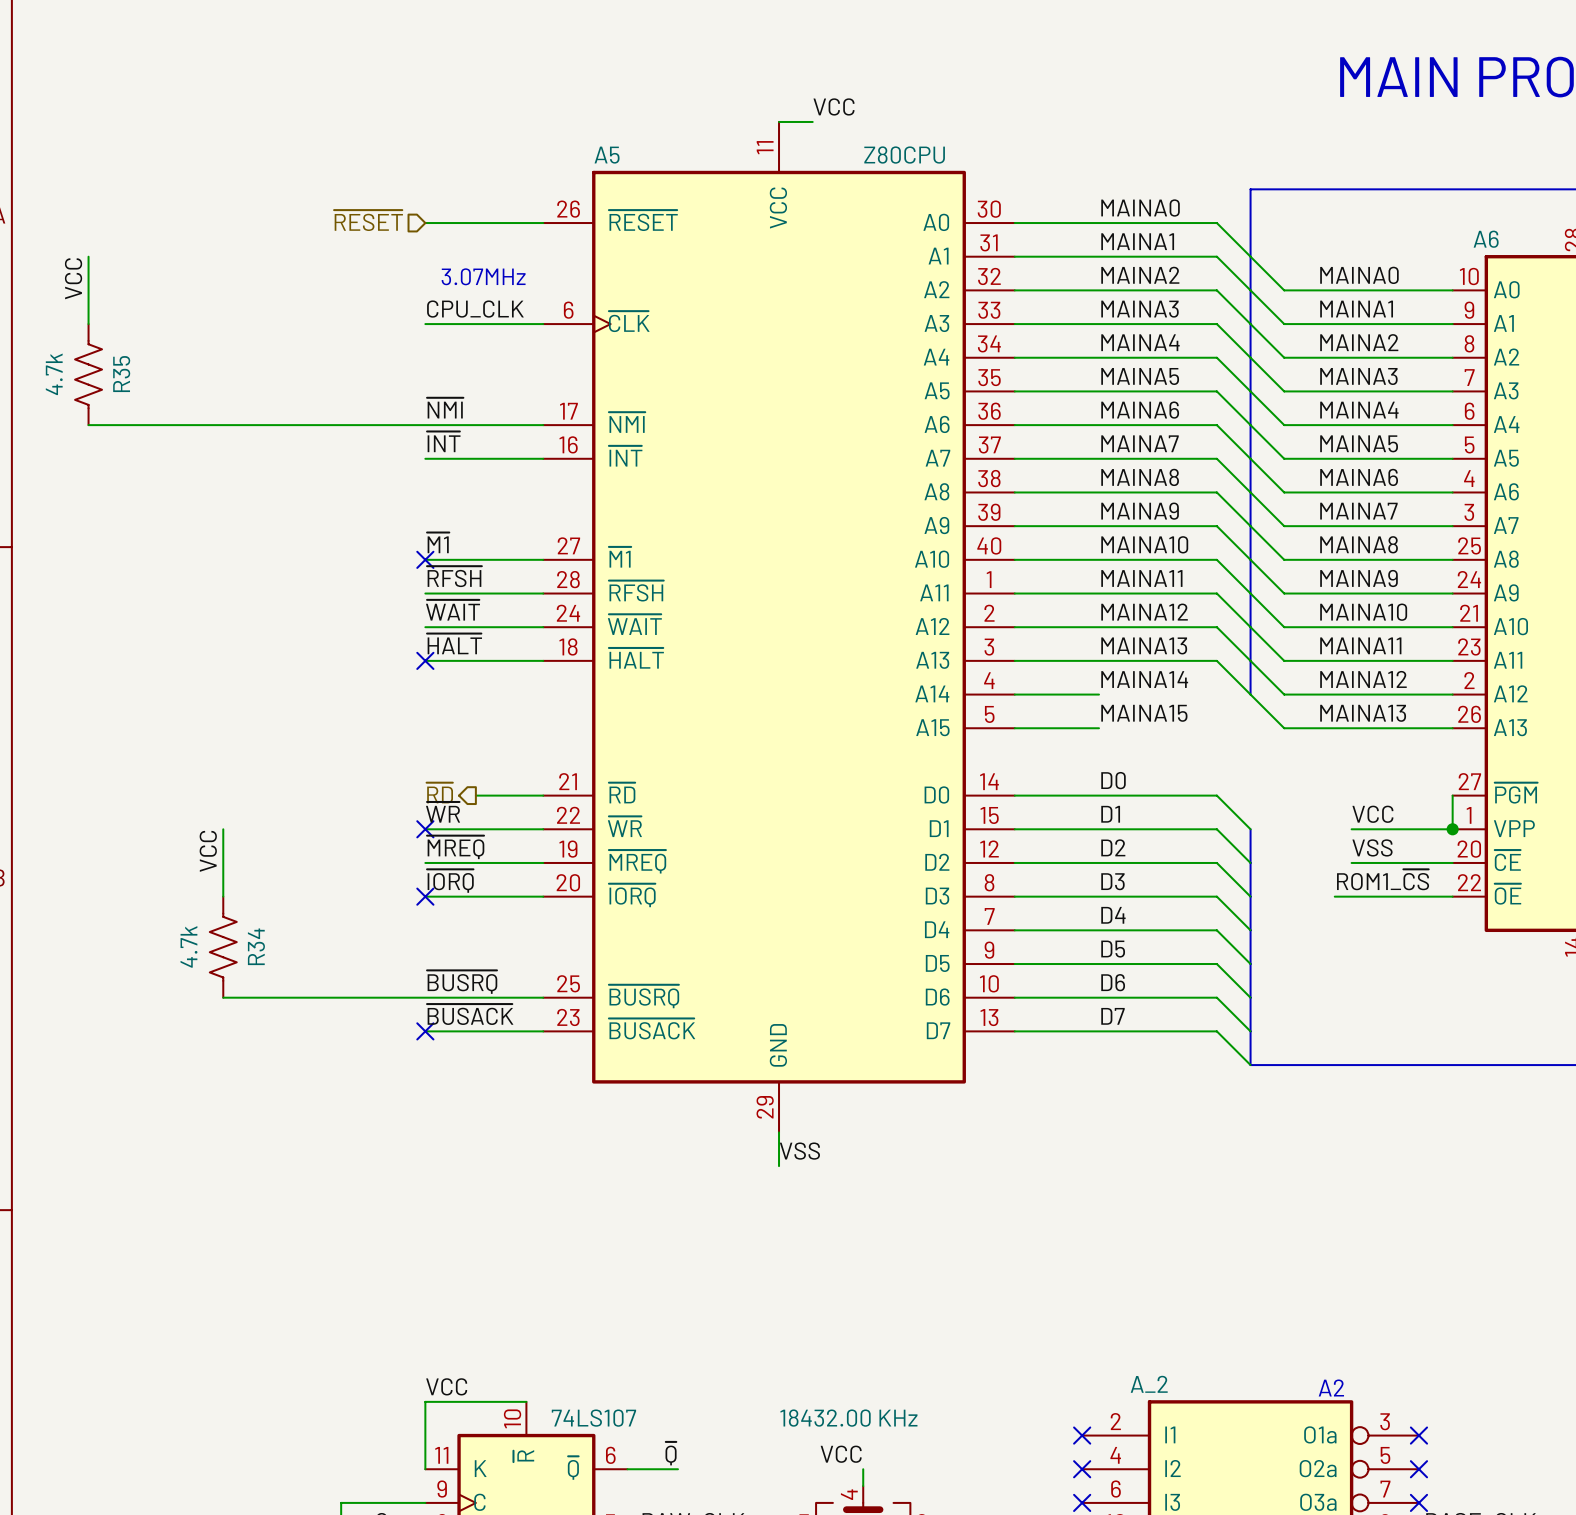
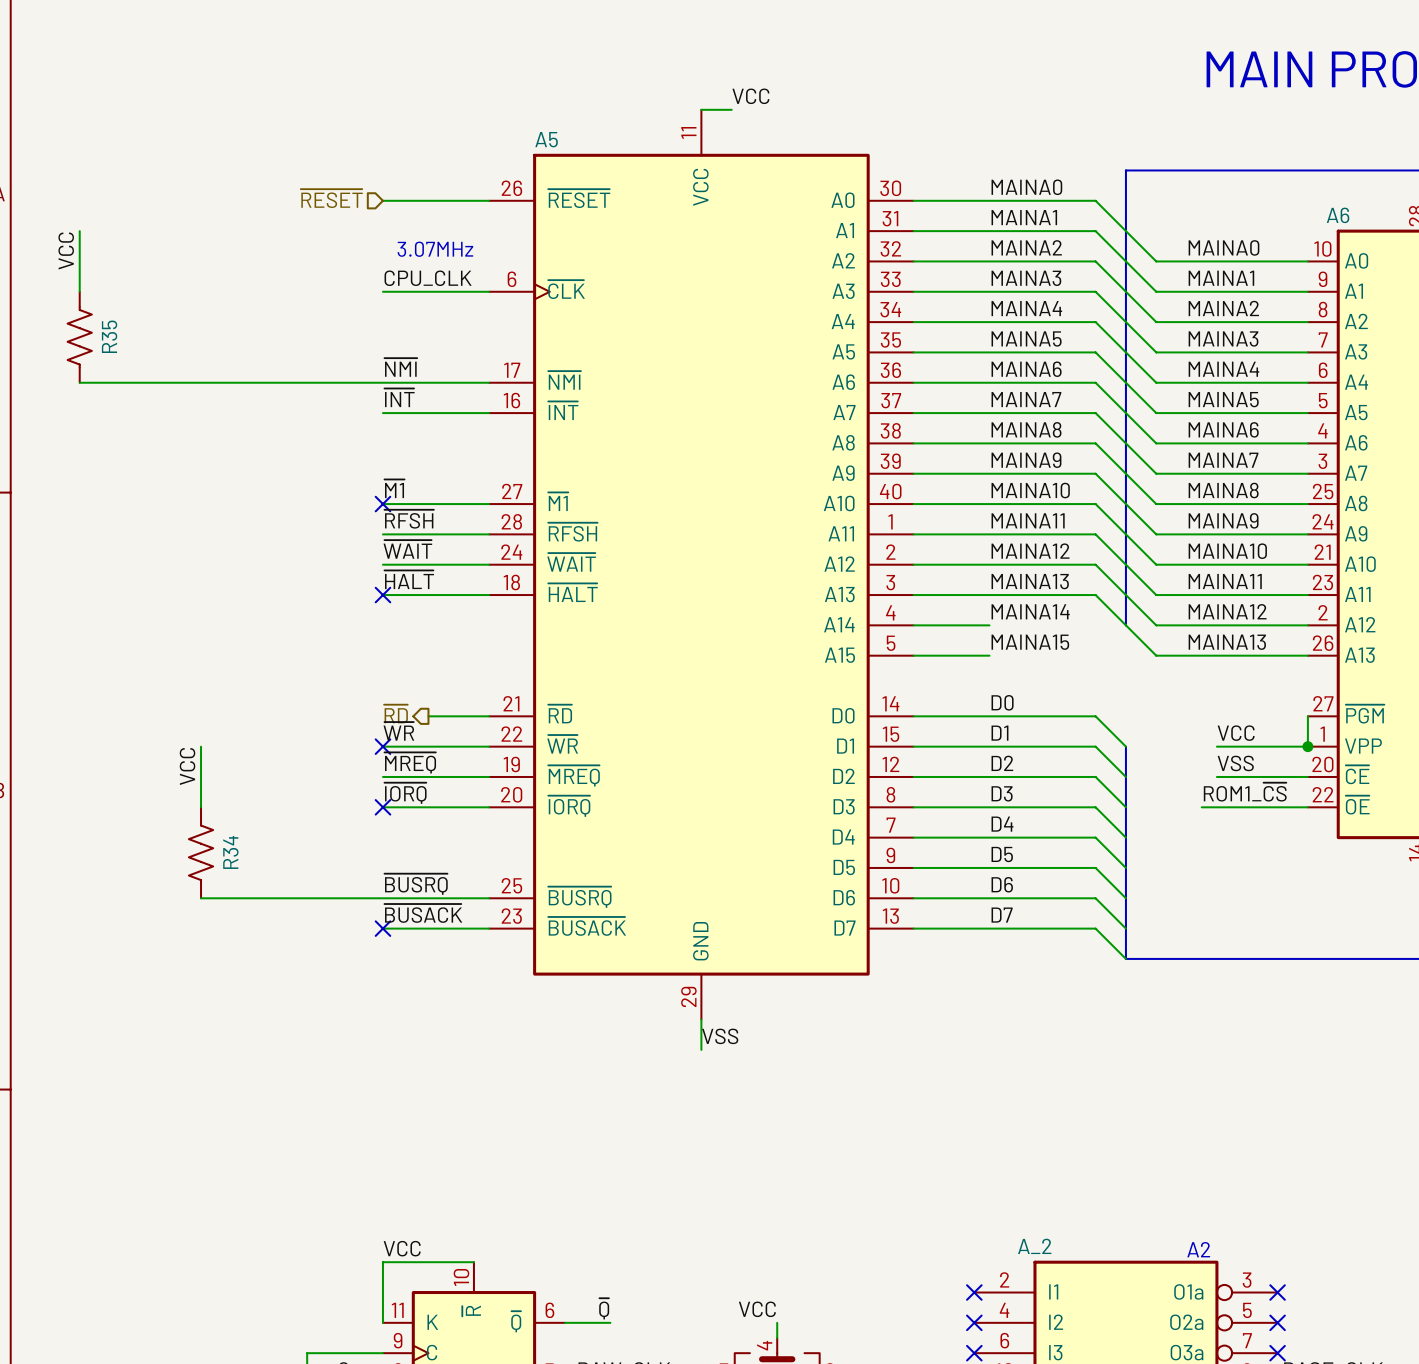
A5 value: Z80CPU (904, 155) -> none
R35 value: 4.7k (54, 374) -> none
R34 value: 4.7k (188, 946) -> none
part value: 74LS107 (593, 1418) -> none
part value: 18432.00 KHz (848, 1418) -> none

